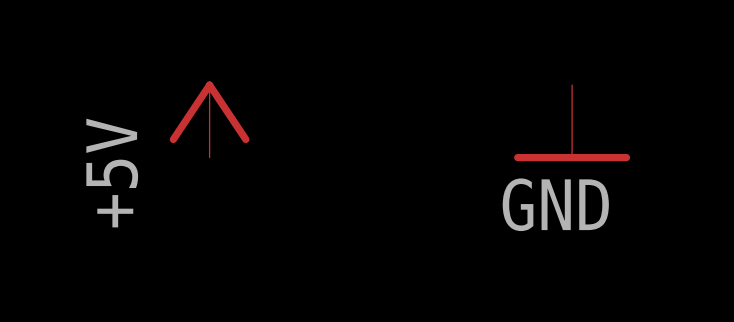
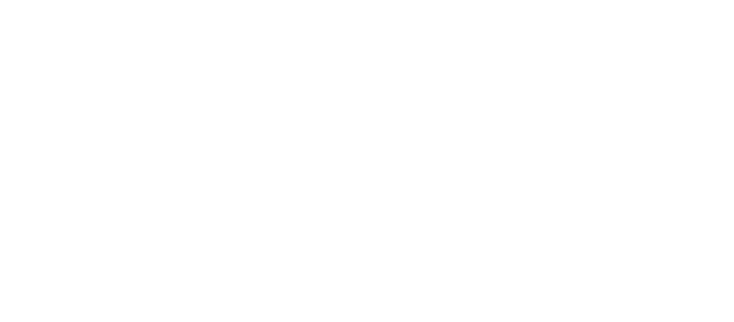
power symbol: +5V (209, 119) -> none
power symbol: GND (572, 123) -> none

